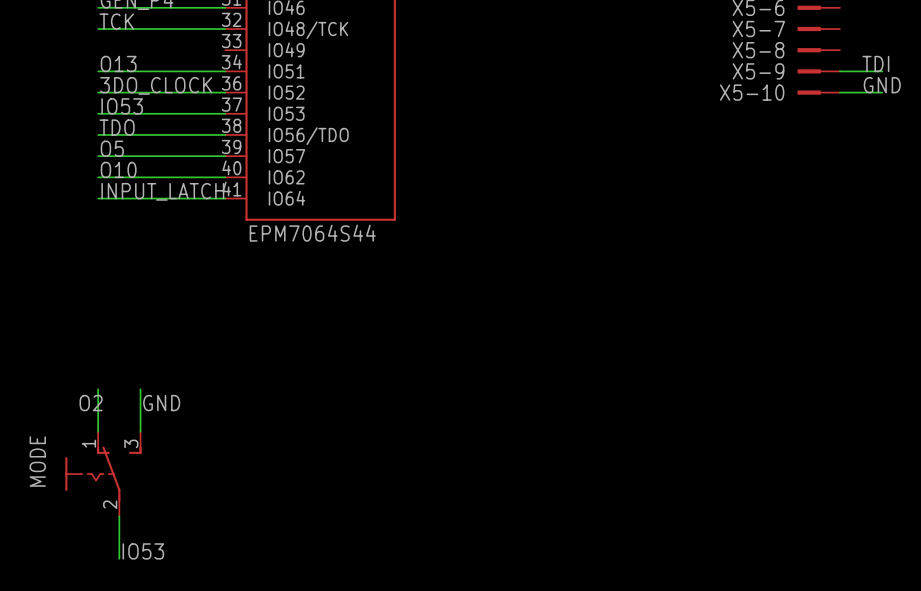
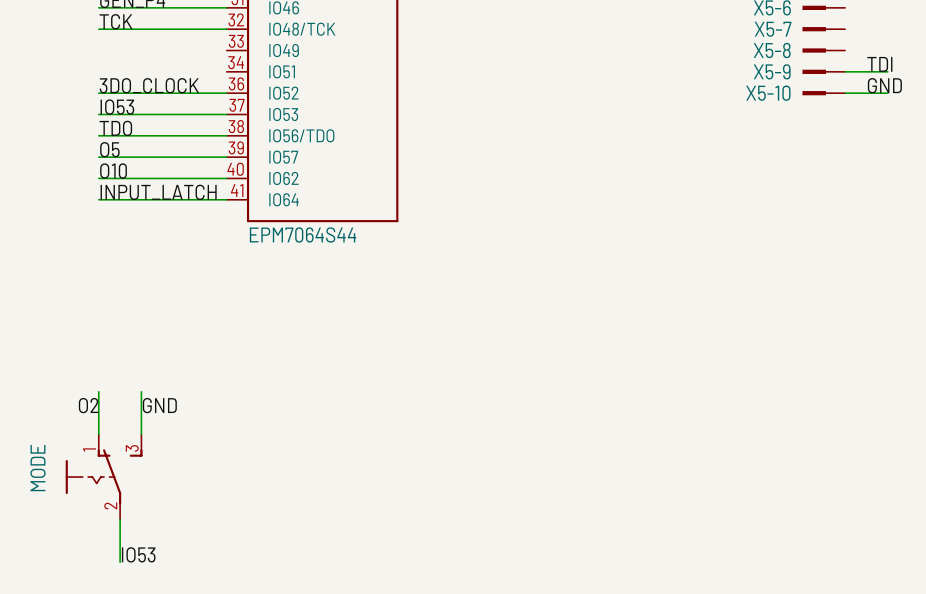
label: O13 (118, 63) -> none
wire: (98, 71) (225, 71) -> none

